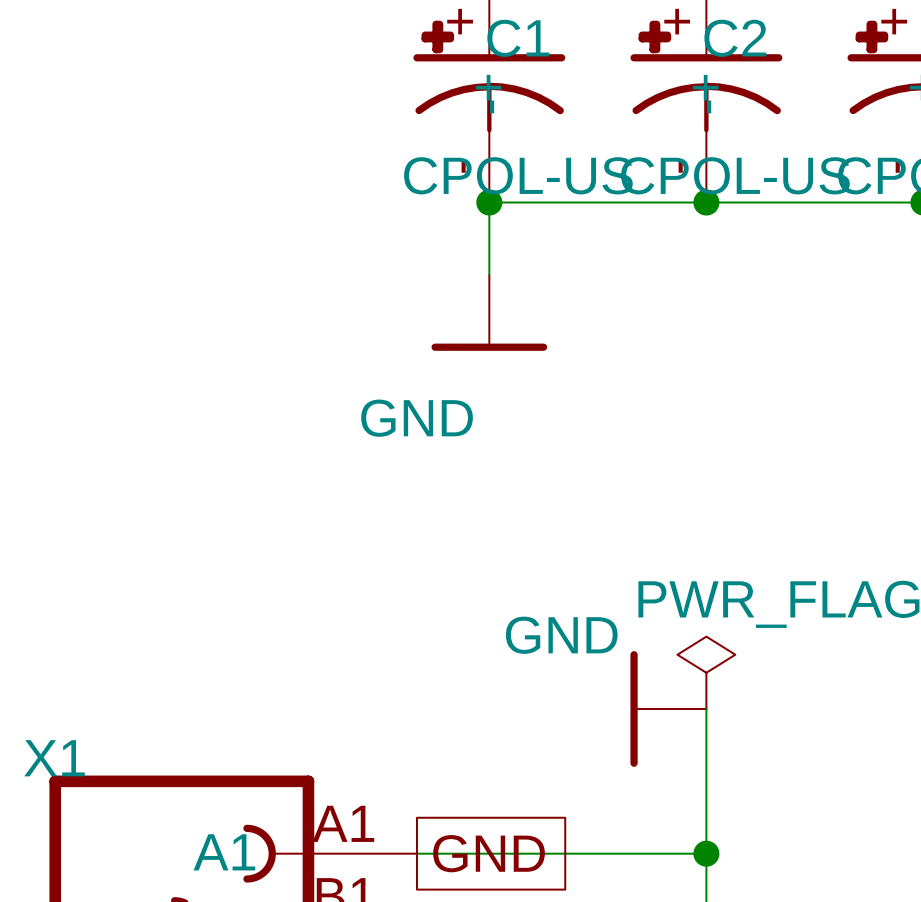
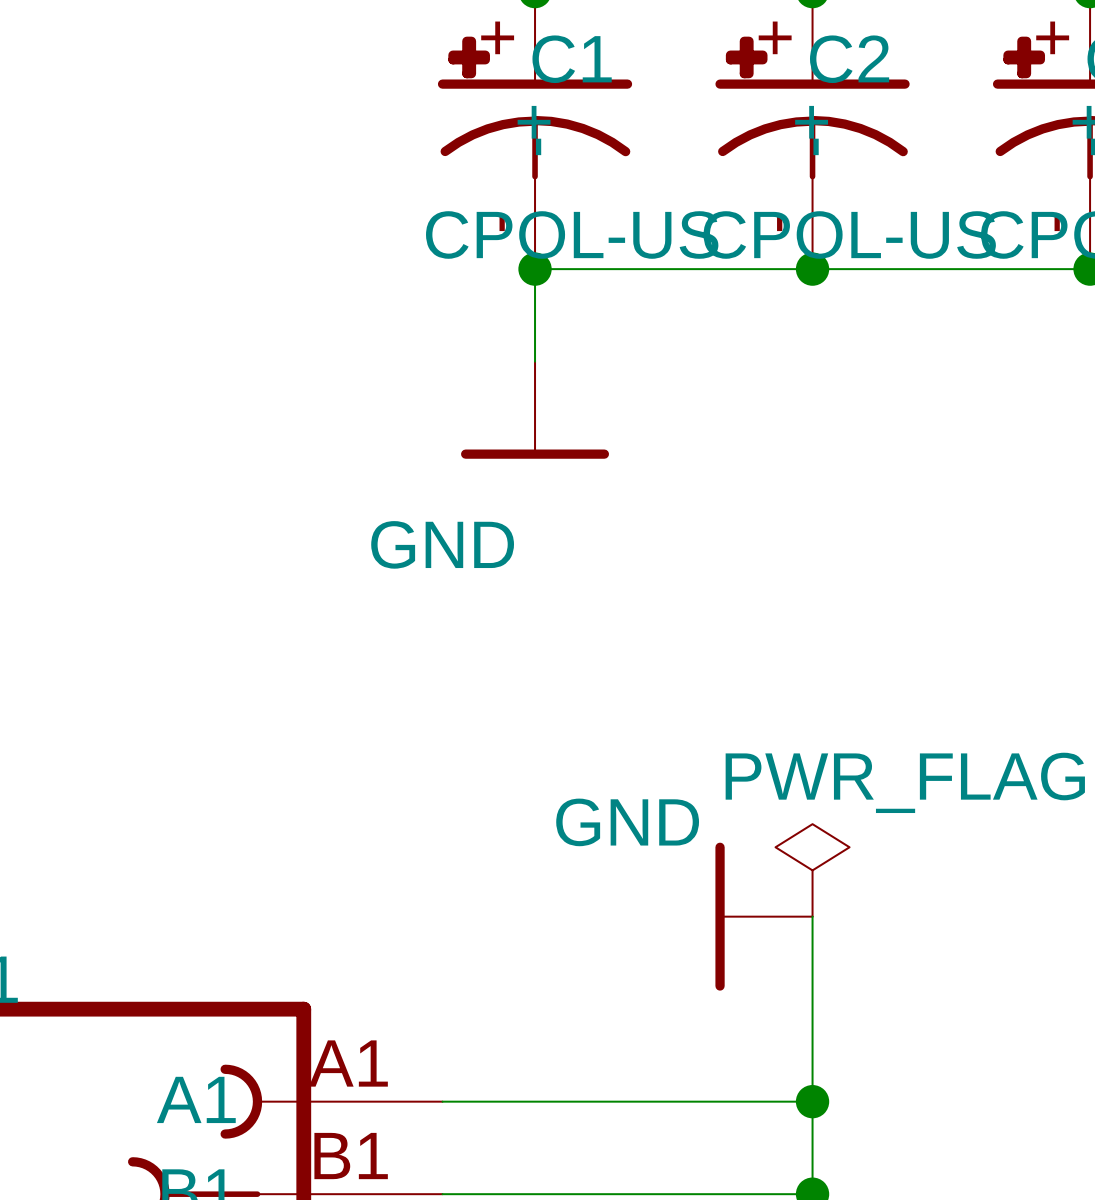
global label: GND (489, 853) -> none

